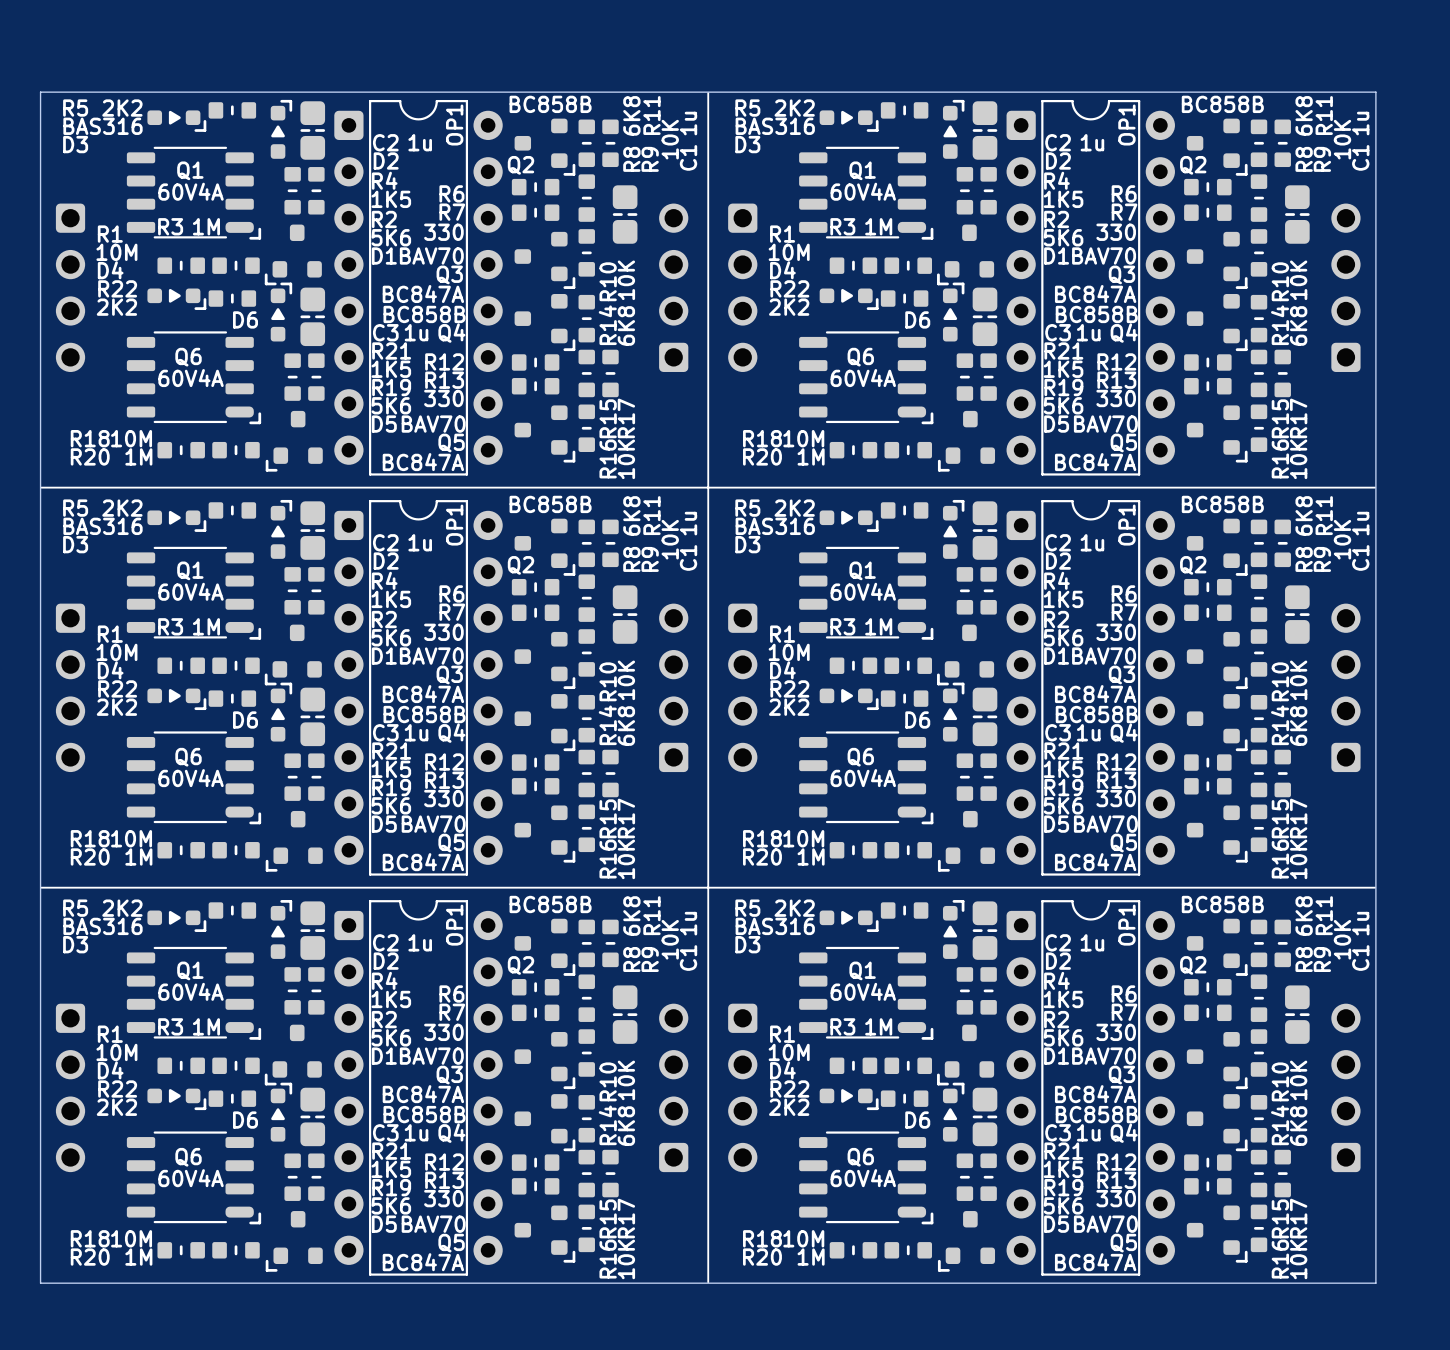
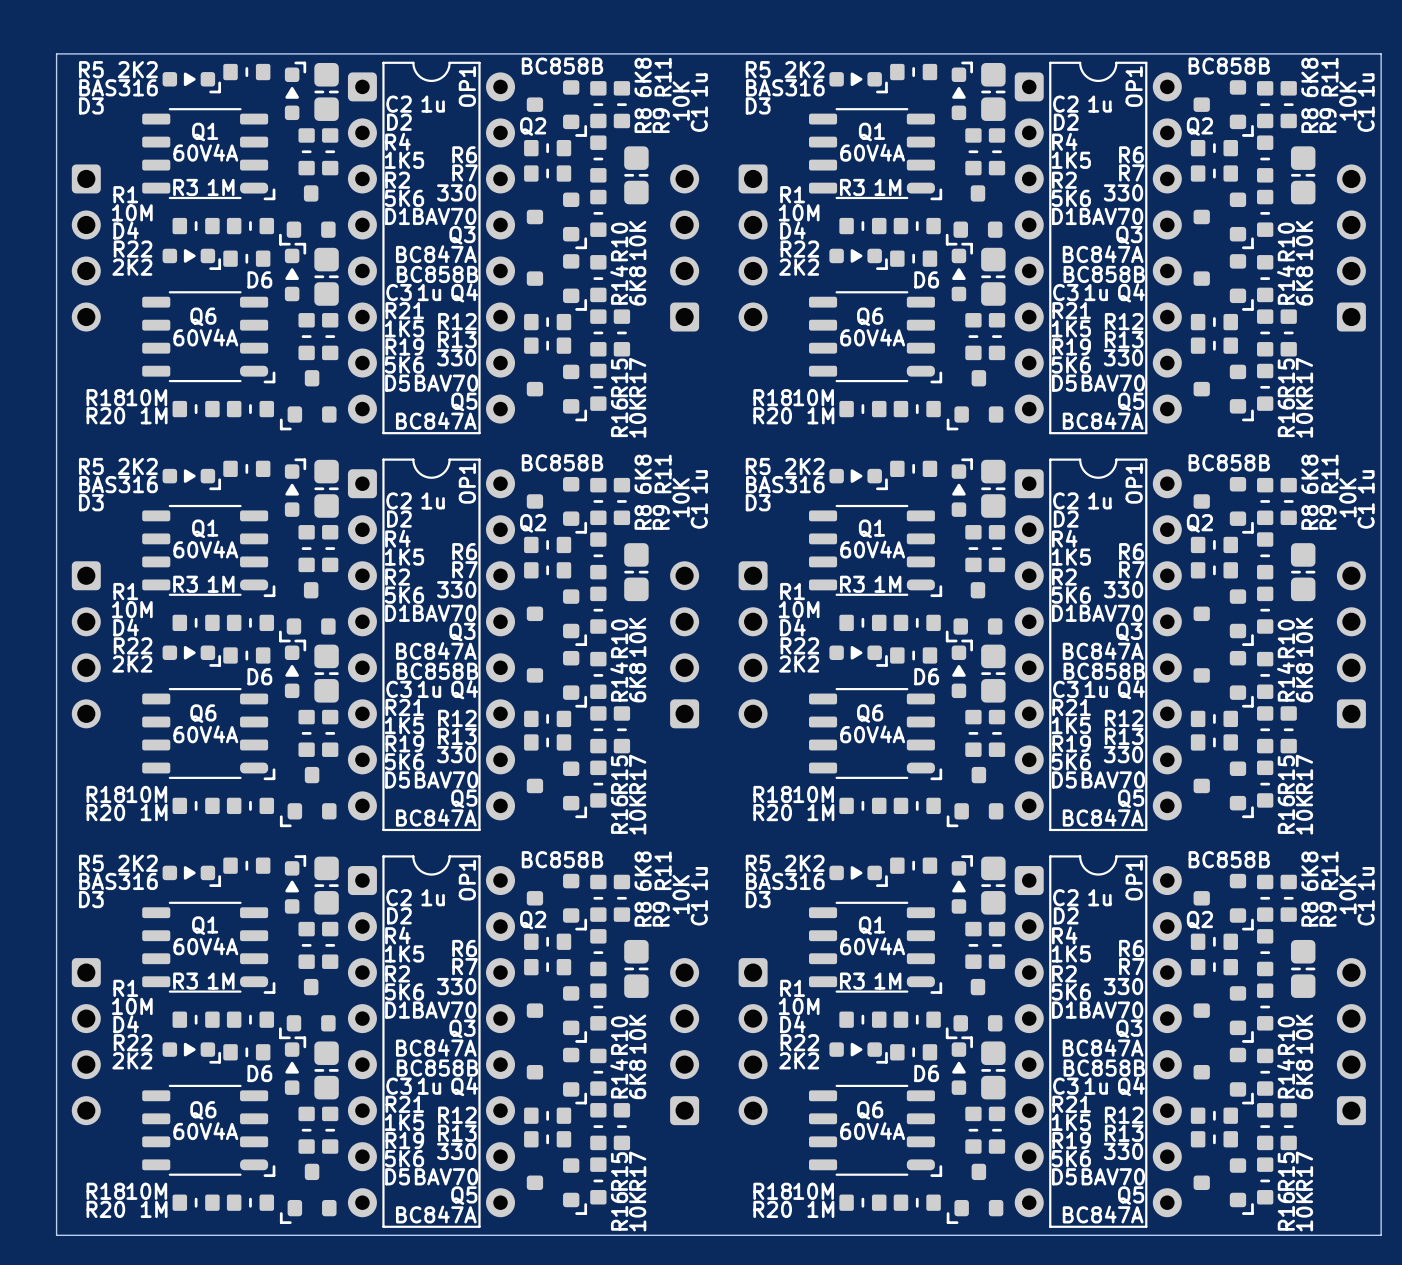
line: (708, 93) (708, 1282) -> none
line: (41, 487) (1374, 487) -> none
line: (41, 887) (1374, 887) -> none

